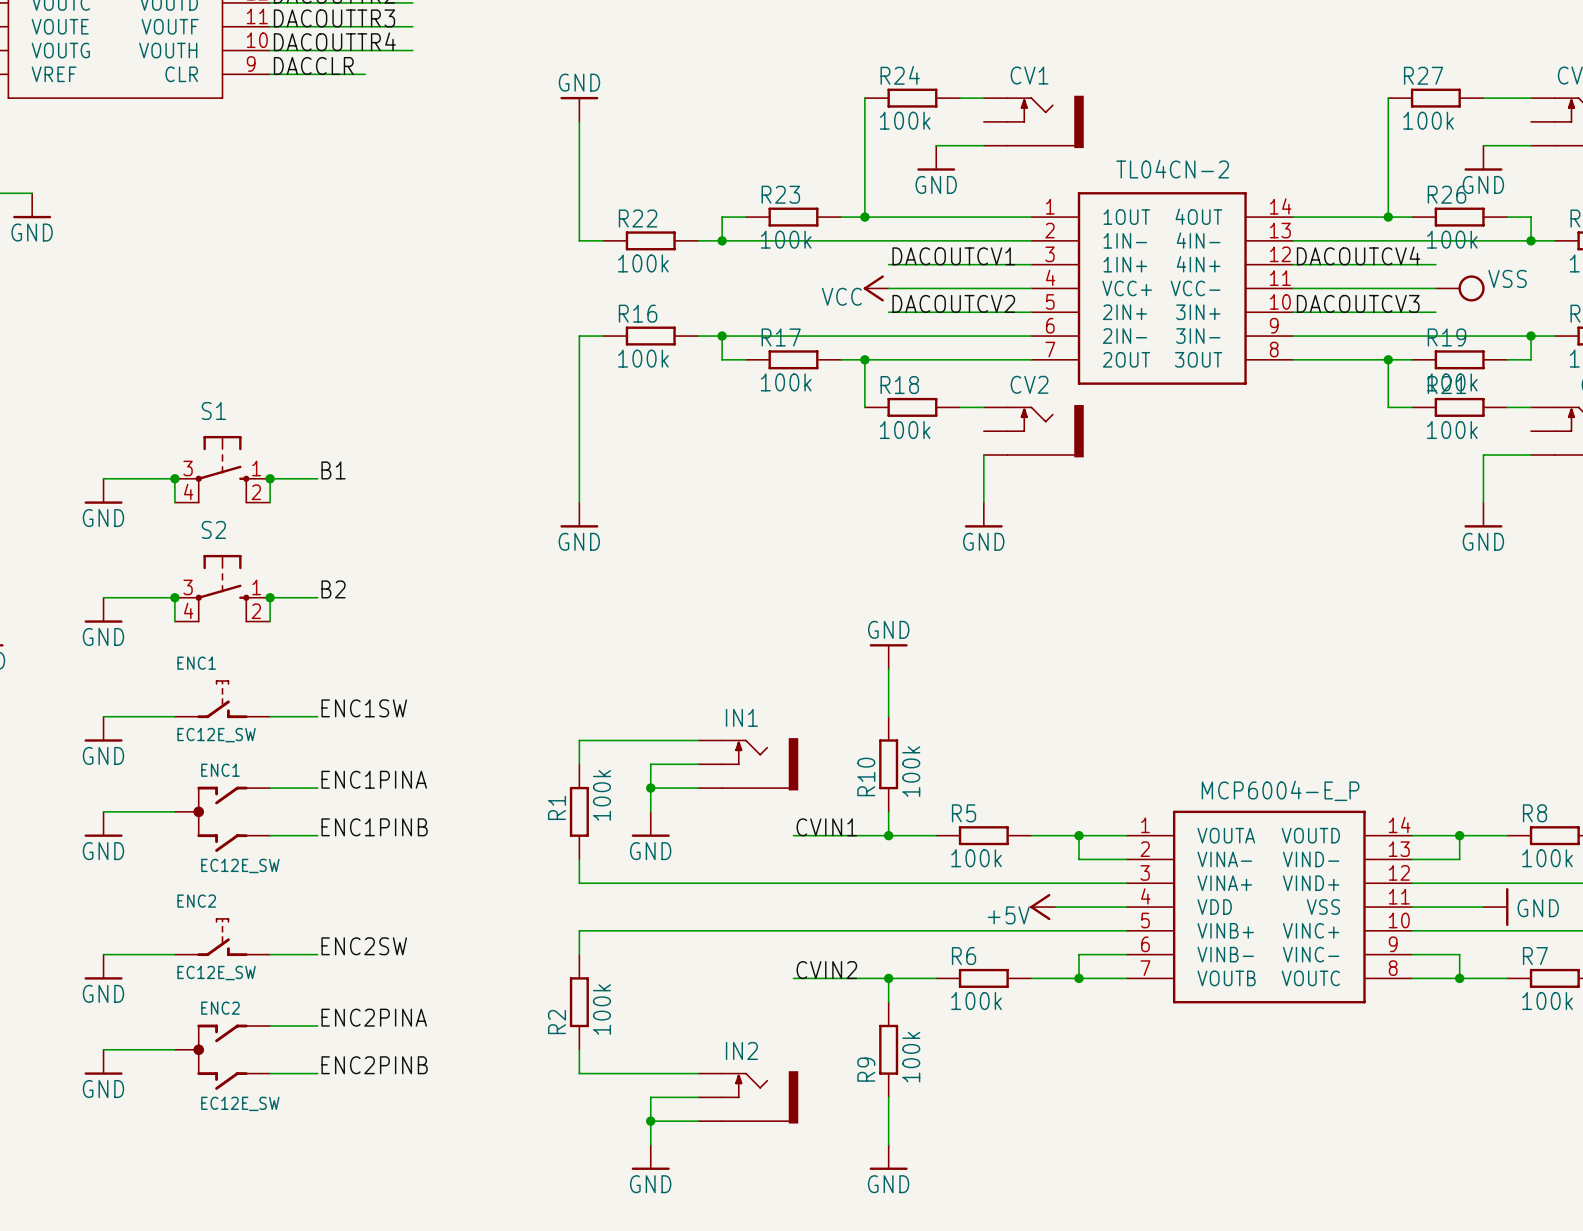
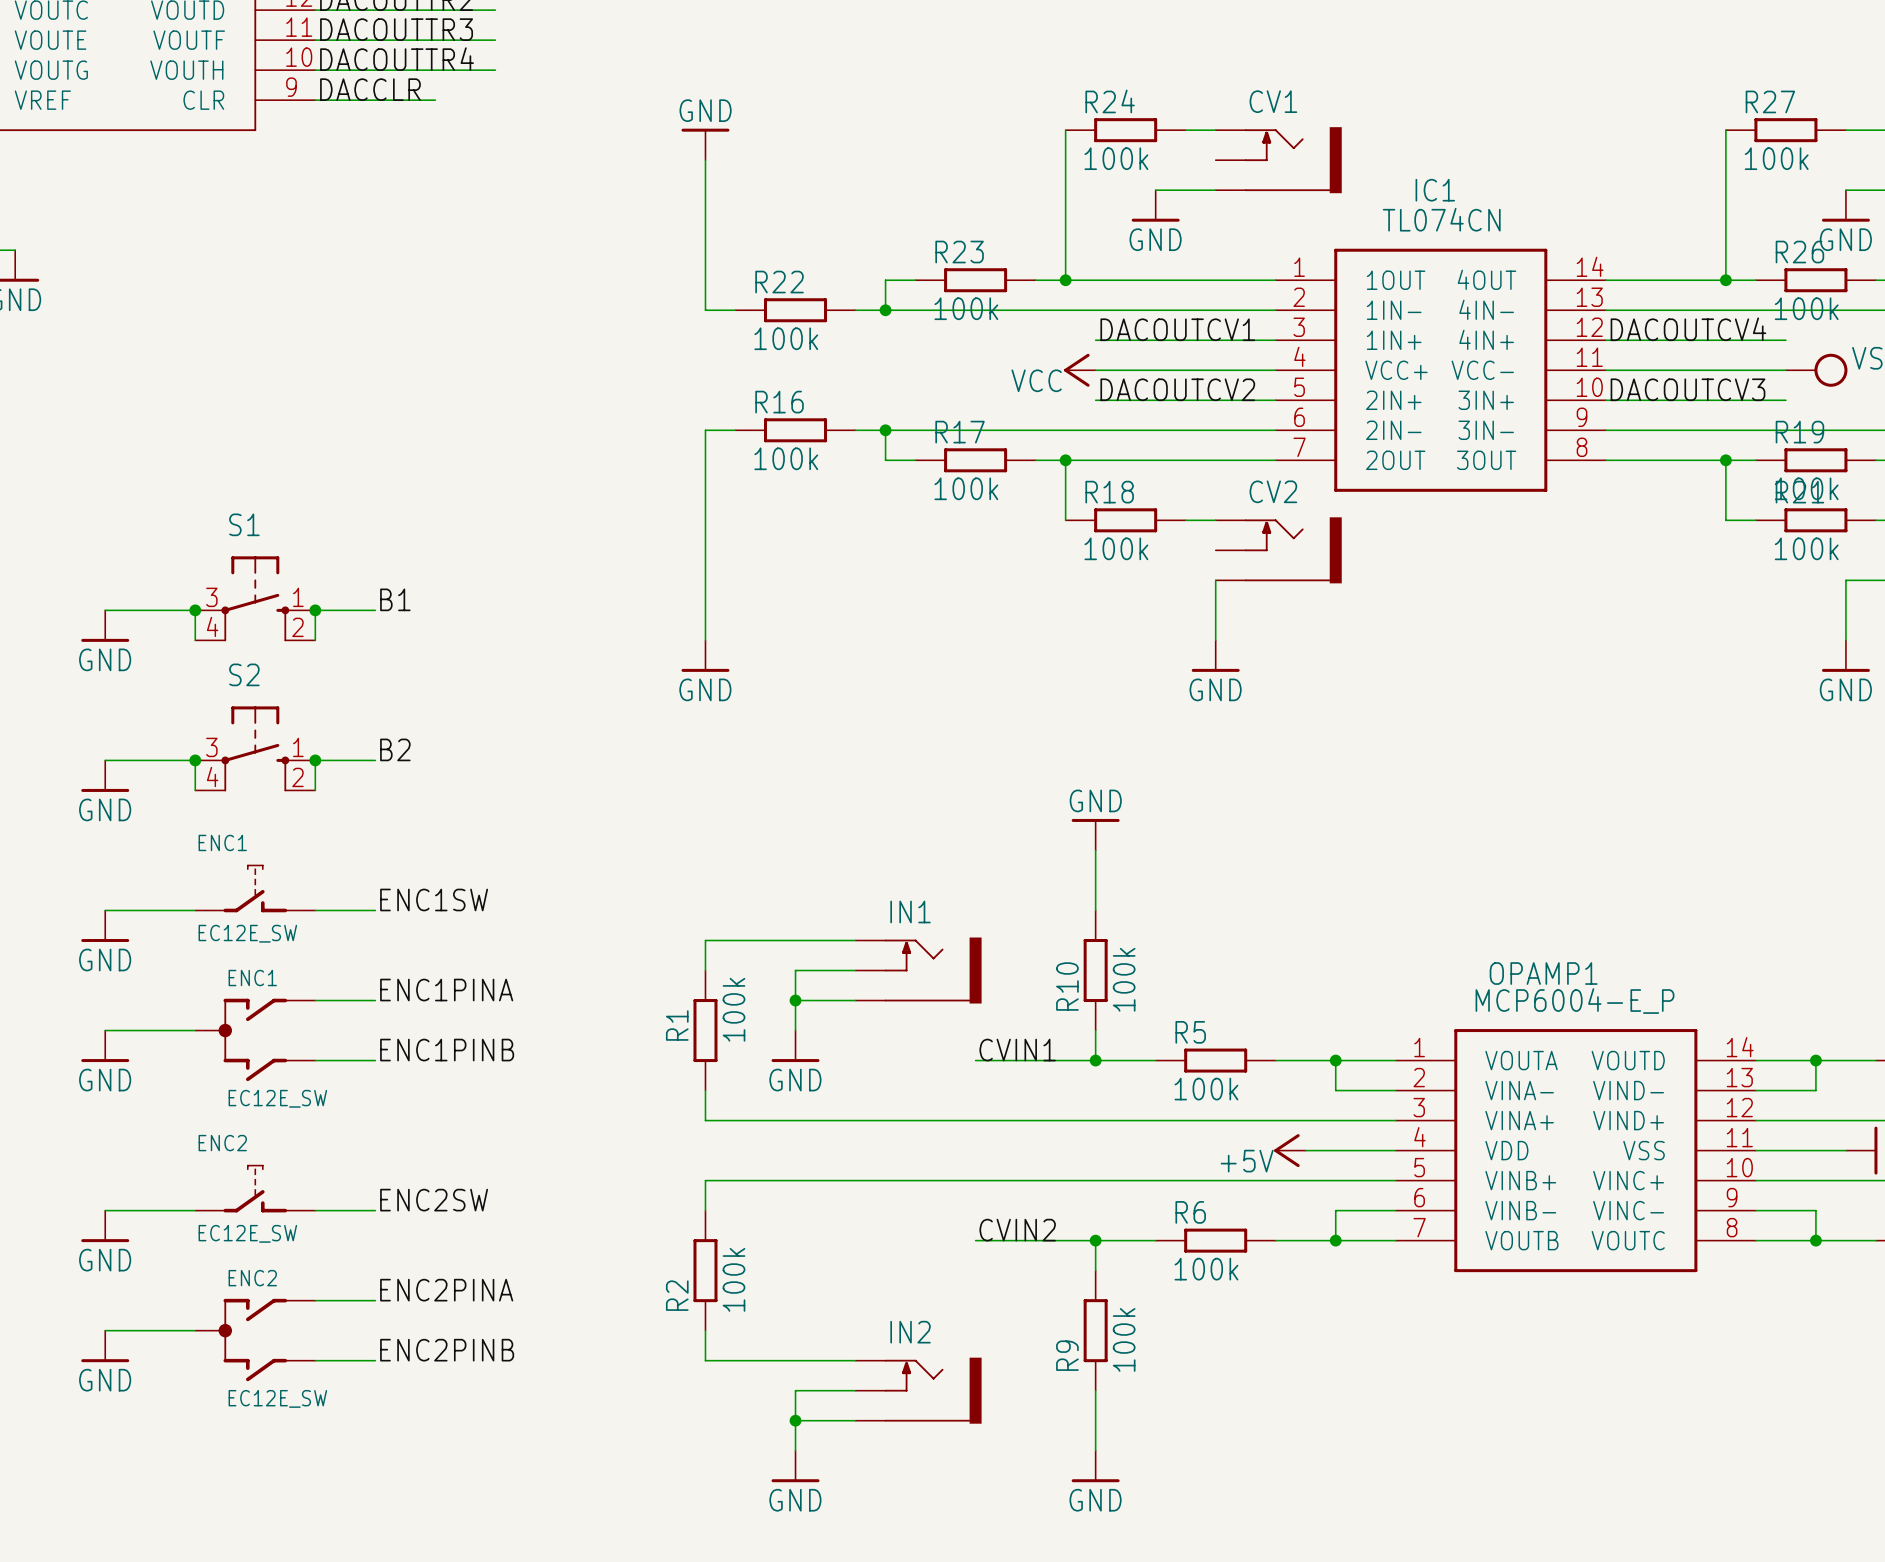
TL04CN-2 value: none -> TL074CN (1441, 219)
TL04CN-2 name: TL04CN-2 (1172, 169) -> IC1 (1435, 190)
MCP6004-E_P value: none -> MCP6004-E_P (1574, 1001)
MCP6004-E_P name: MCP6004-E_P (1280, 790) -> OPAMP1 (1543, 973)

